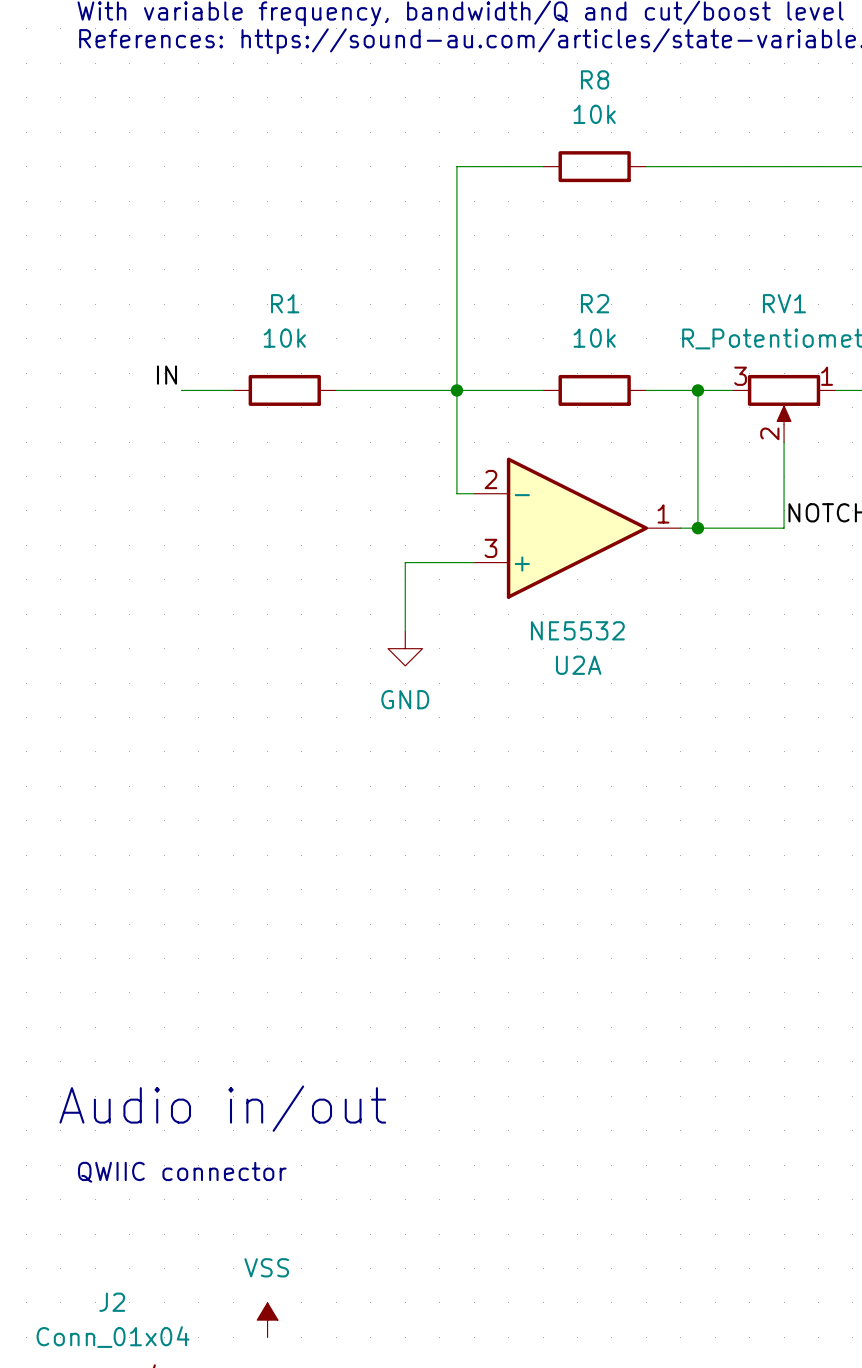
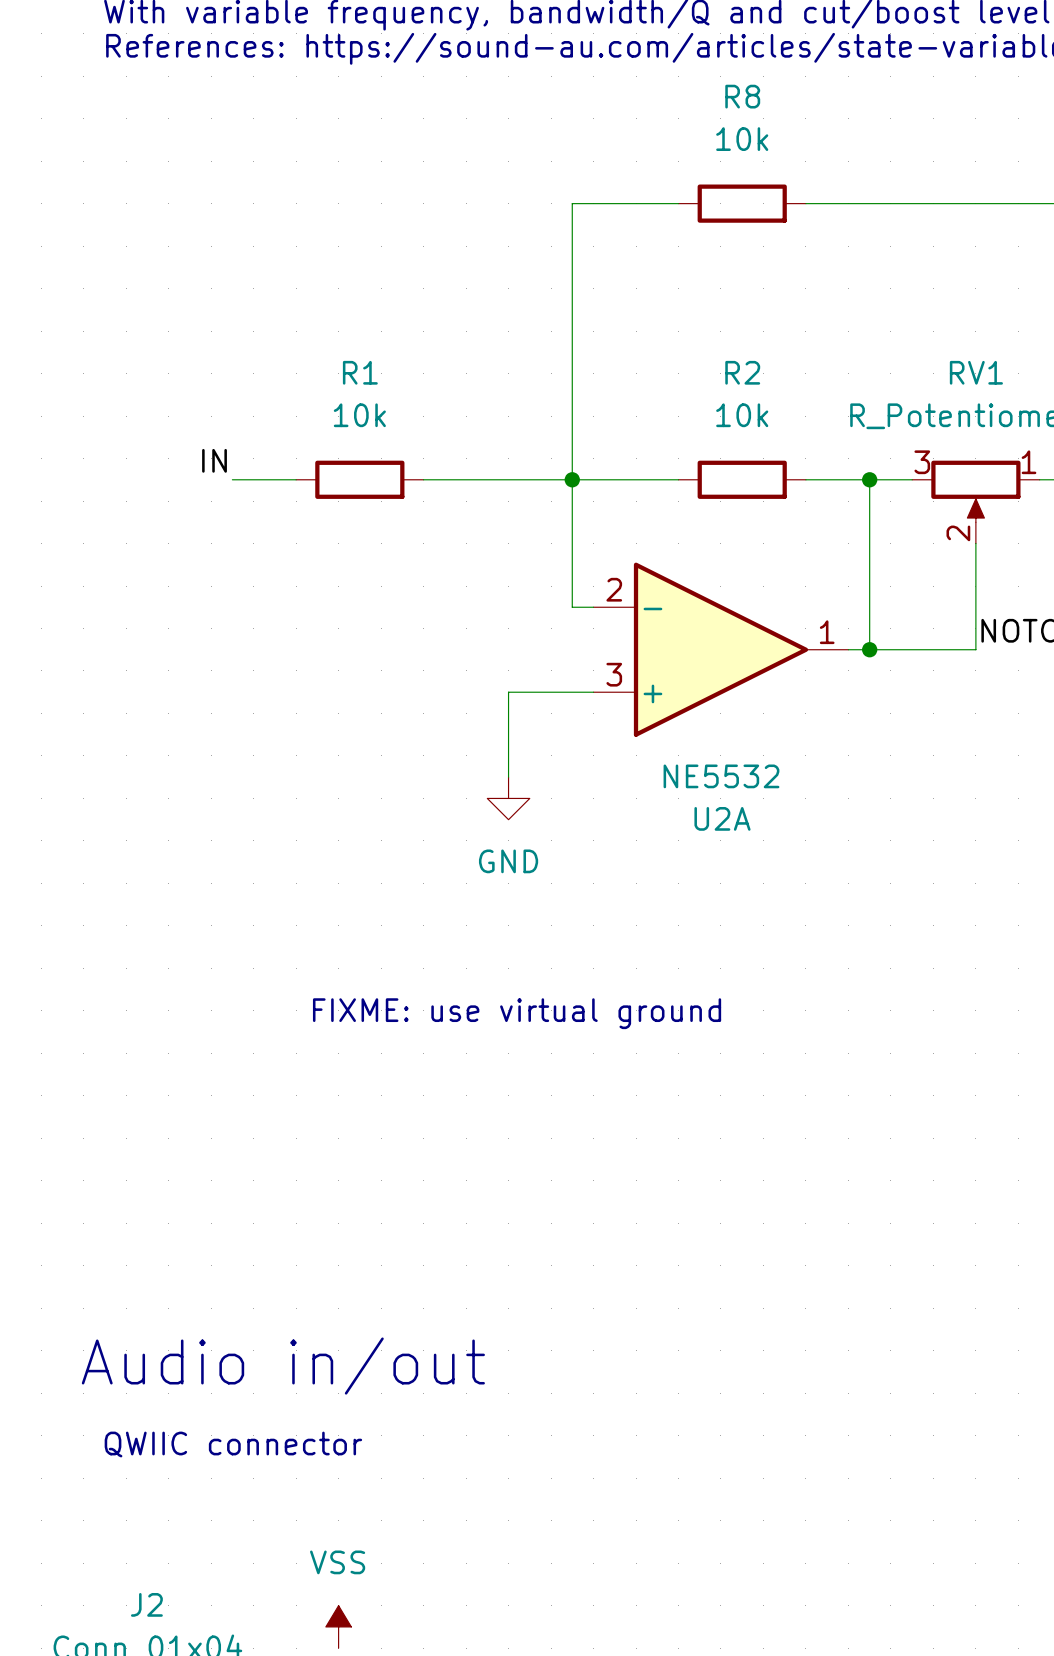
text: none -> FIXME: use virtual ground (517, 1013)

